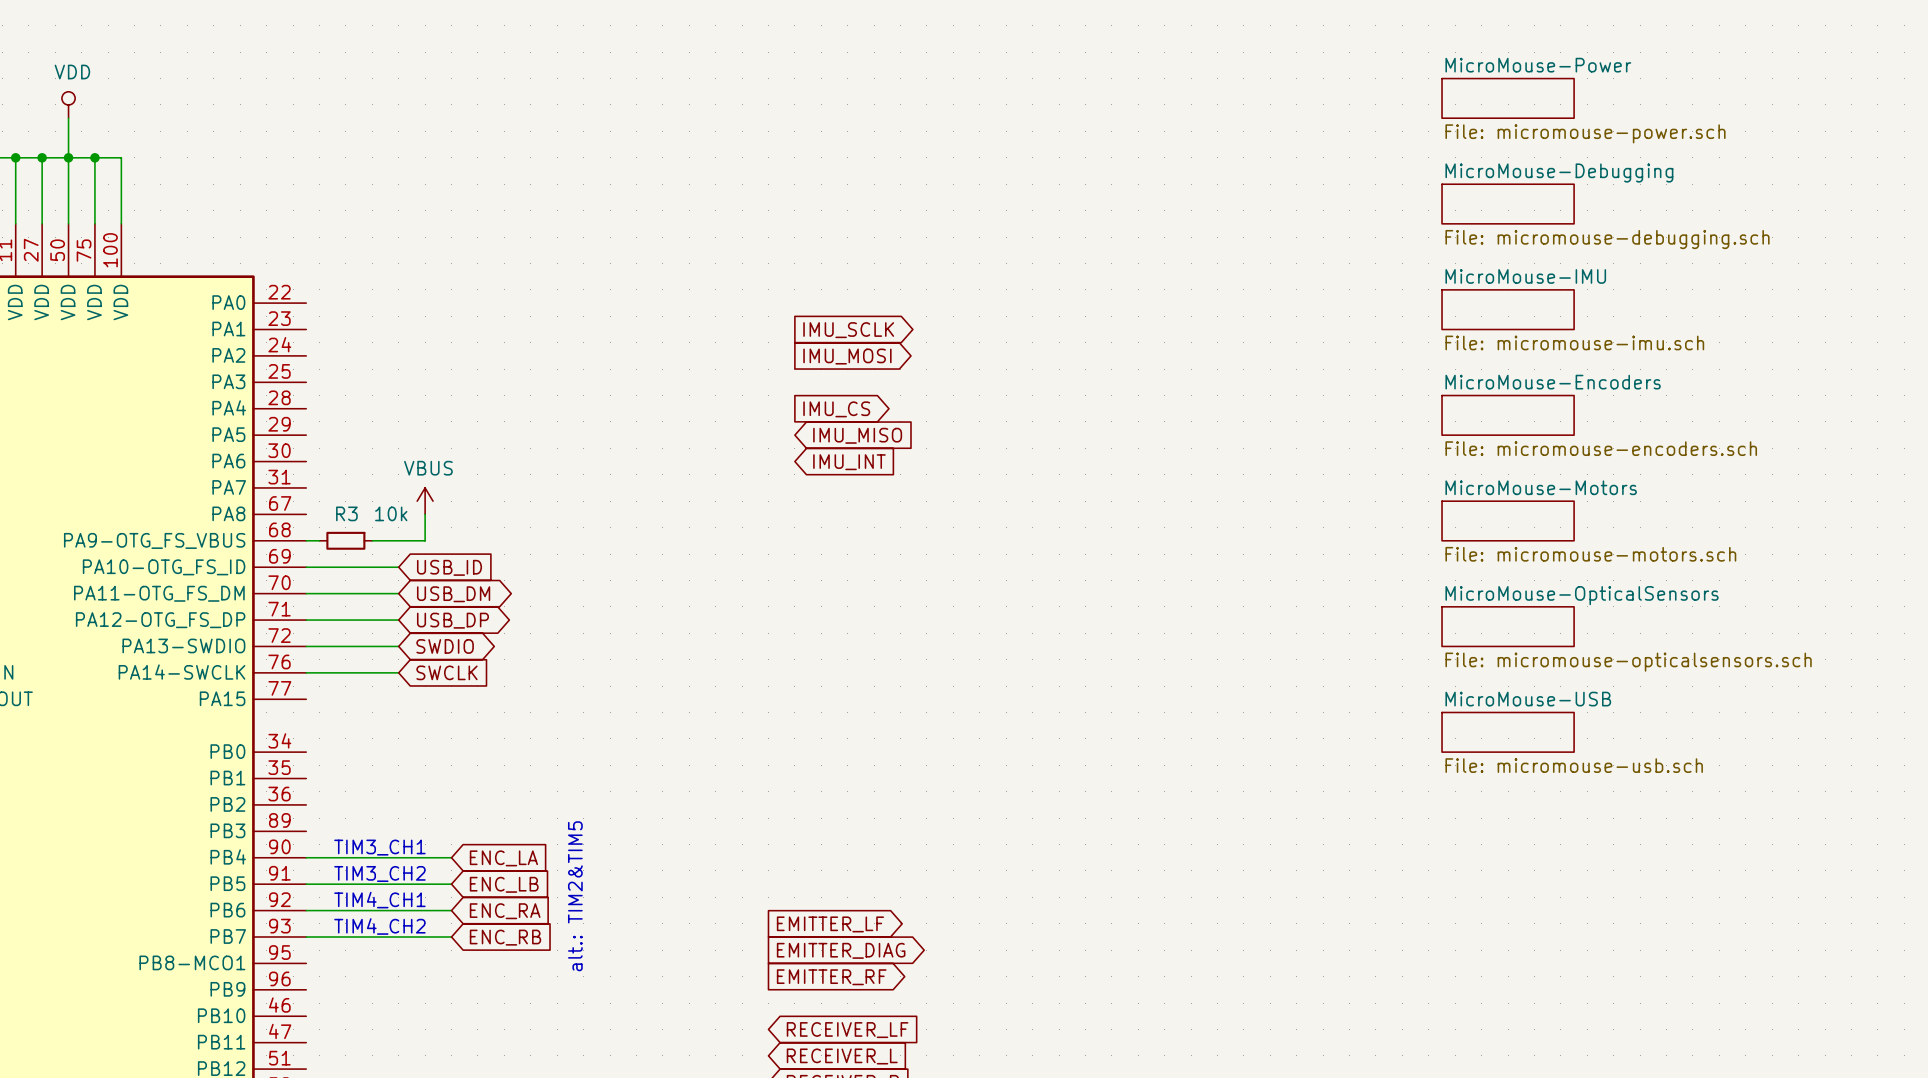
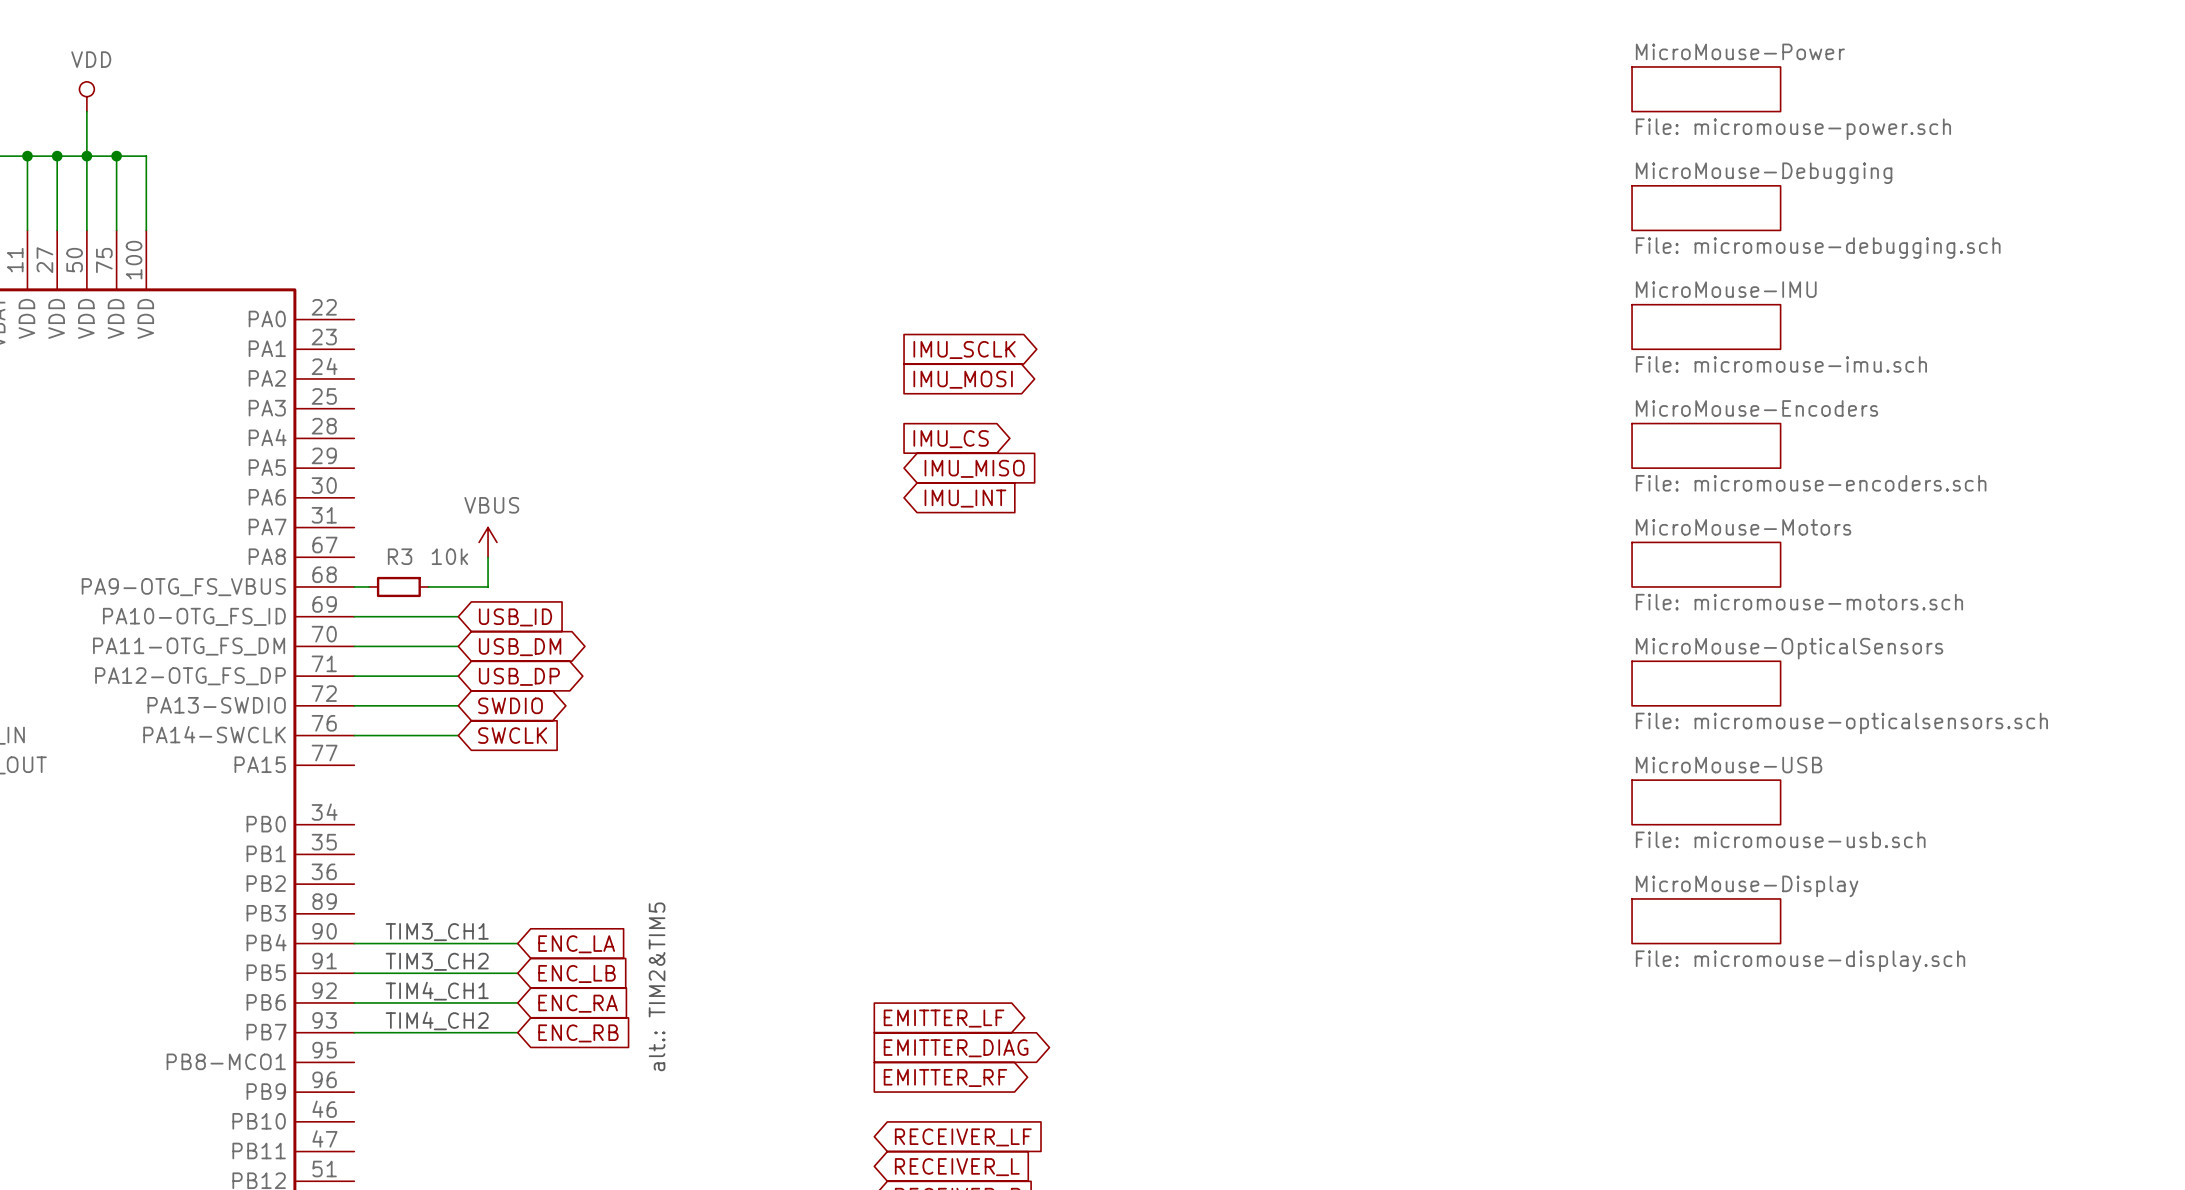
sheet MicroMouse-Display: none -> File: micromouse-display.sch (1706, 921)

